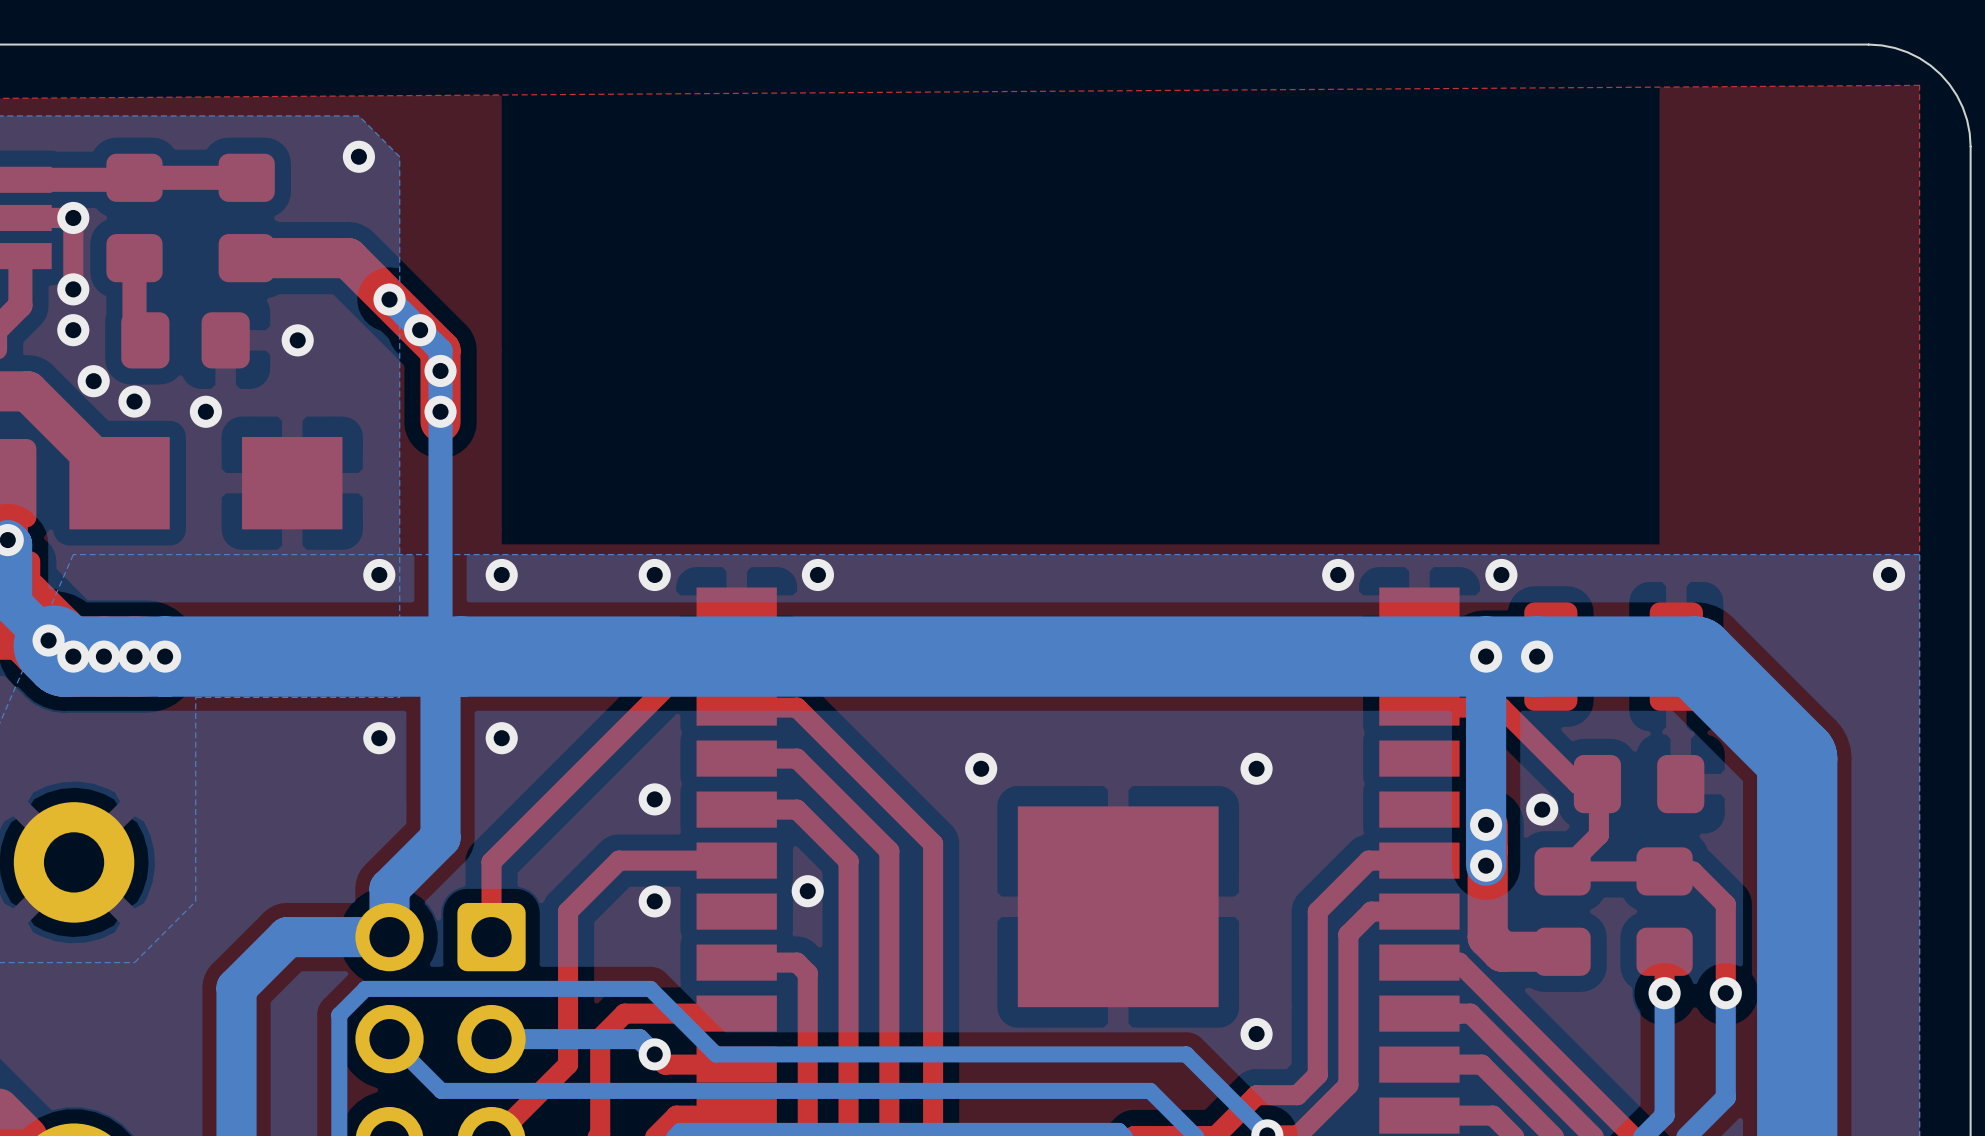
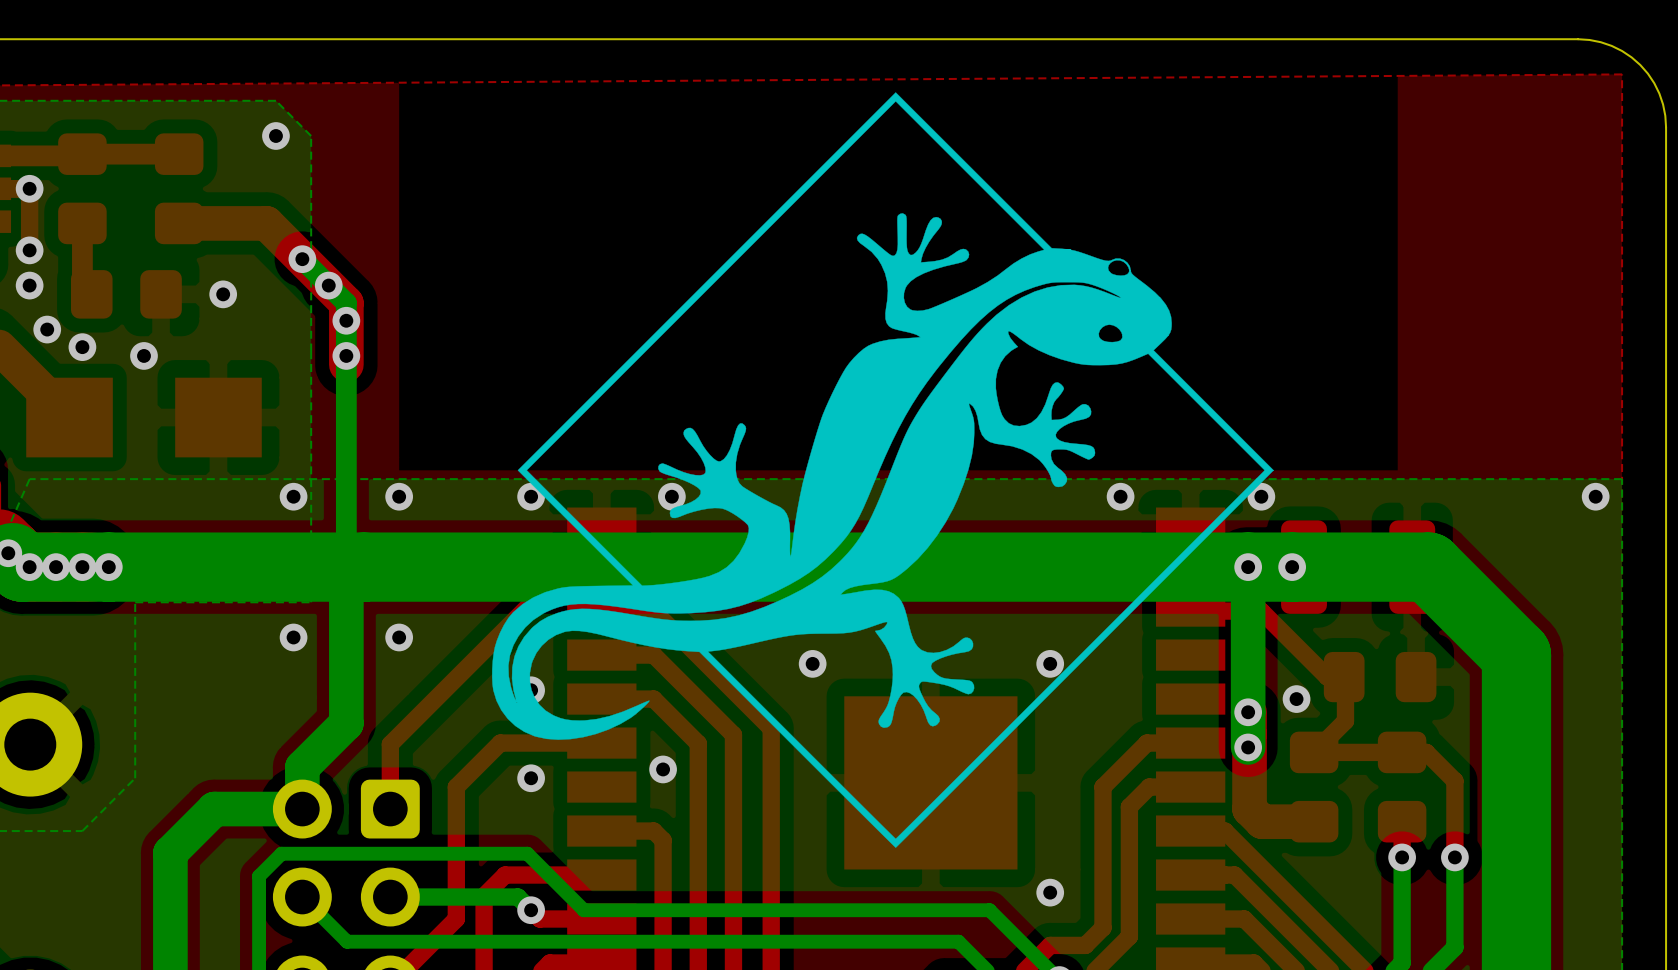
drawing: none -> [492, 92, 1274, 848]

